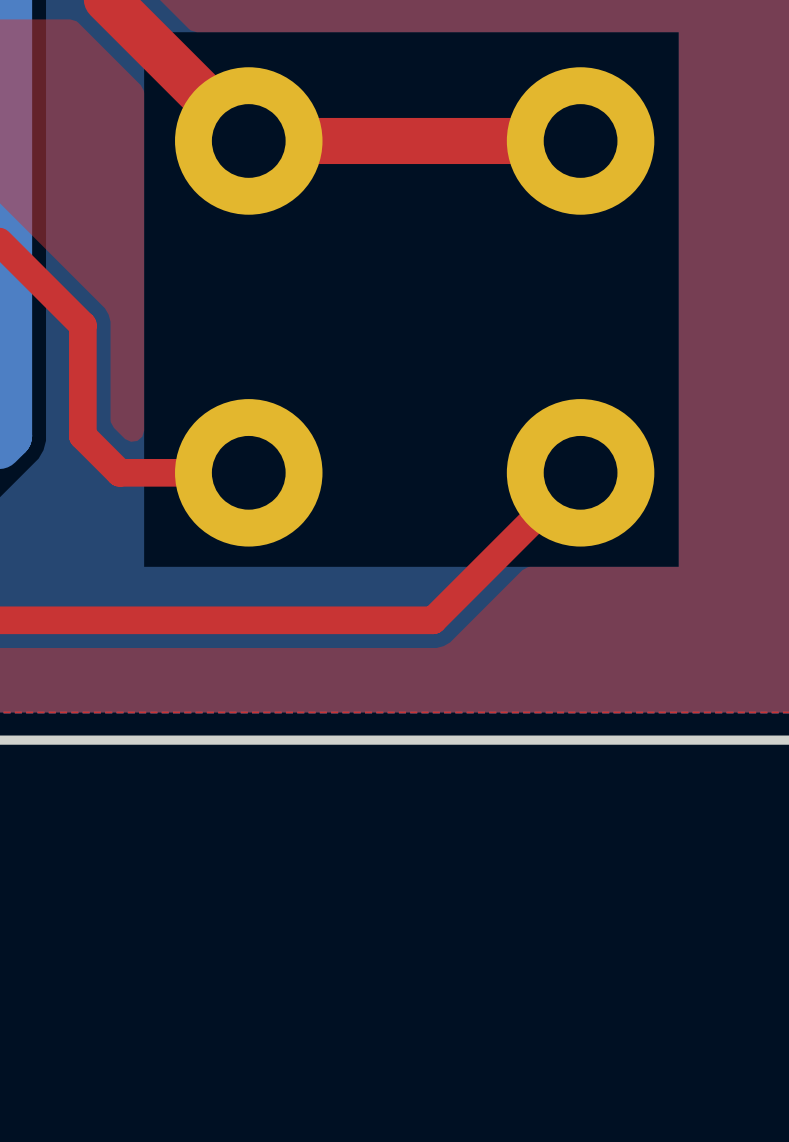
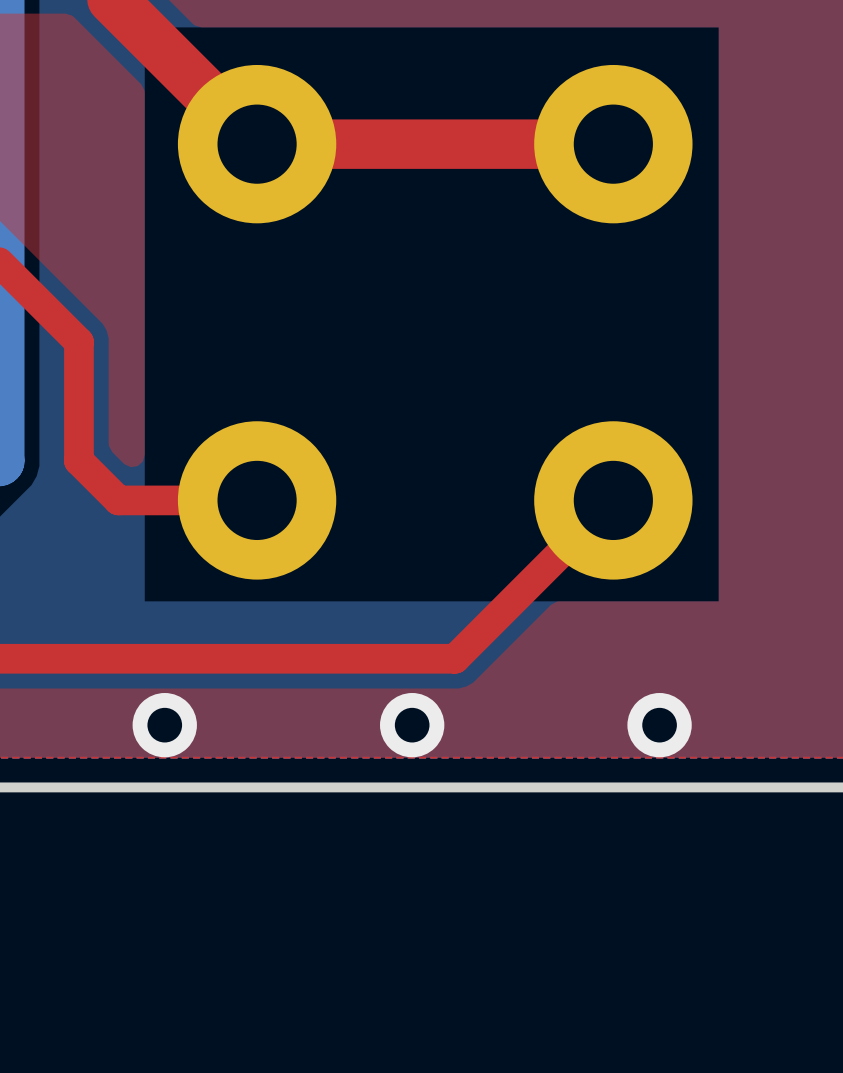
via: none -> (164, 725)
via: none -> (412, 725)
via: none -> (659, 725)

